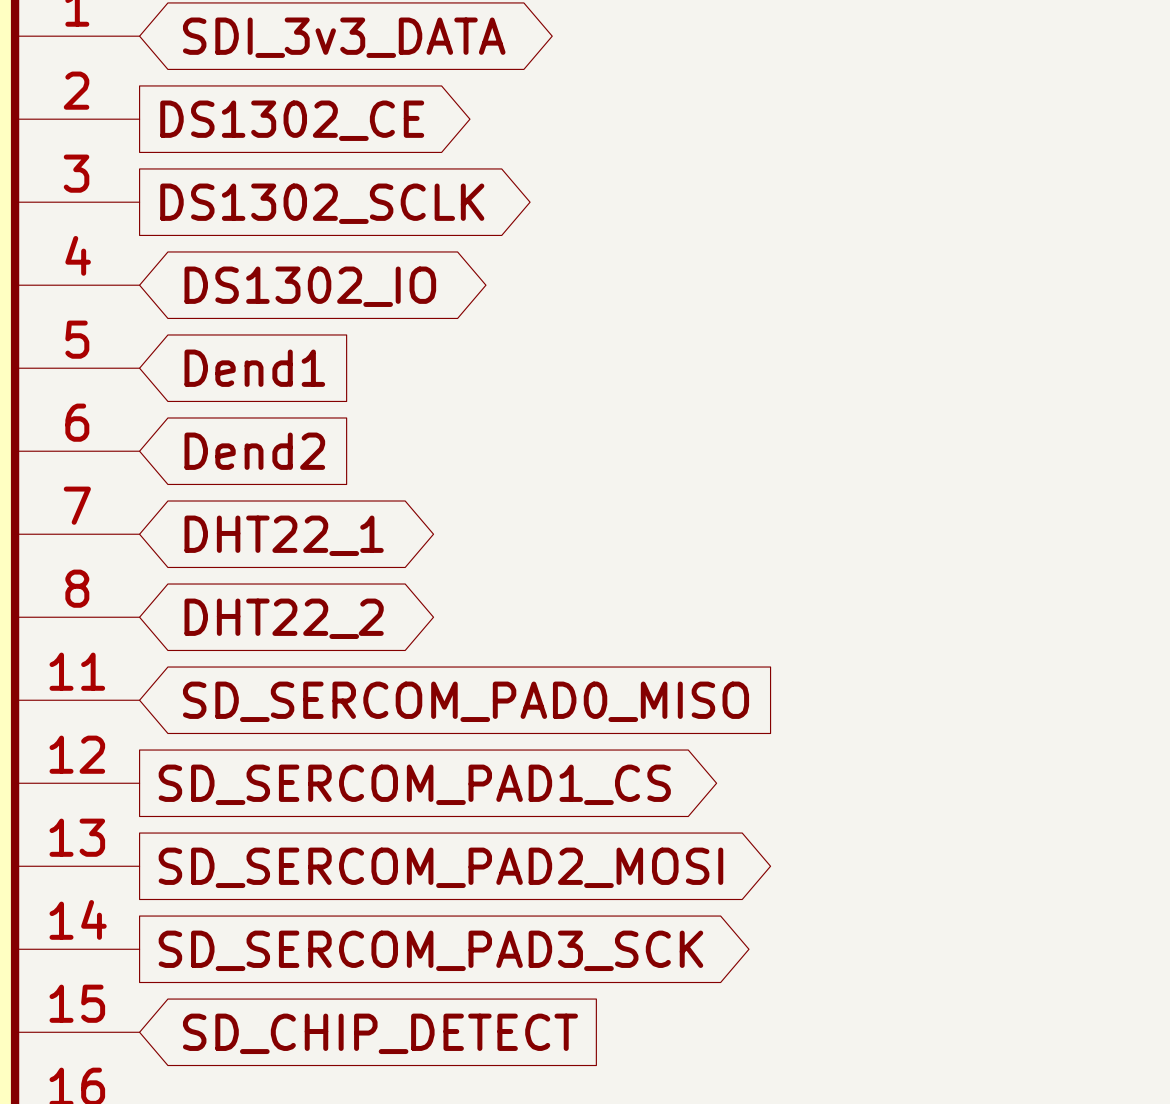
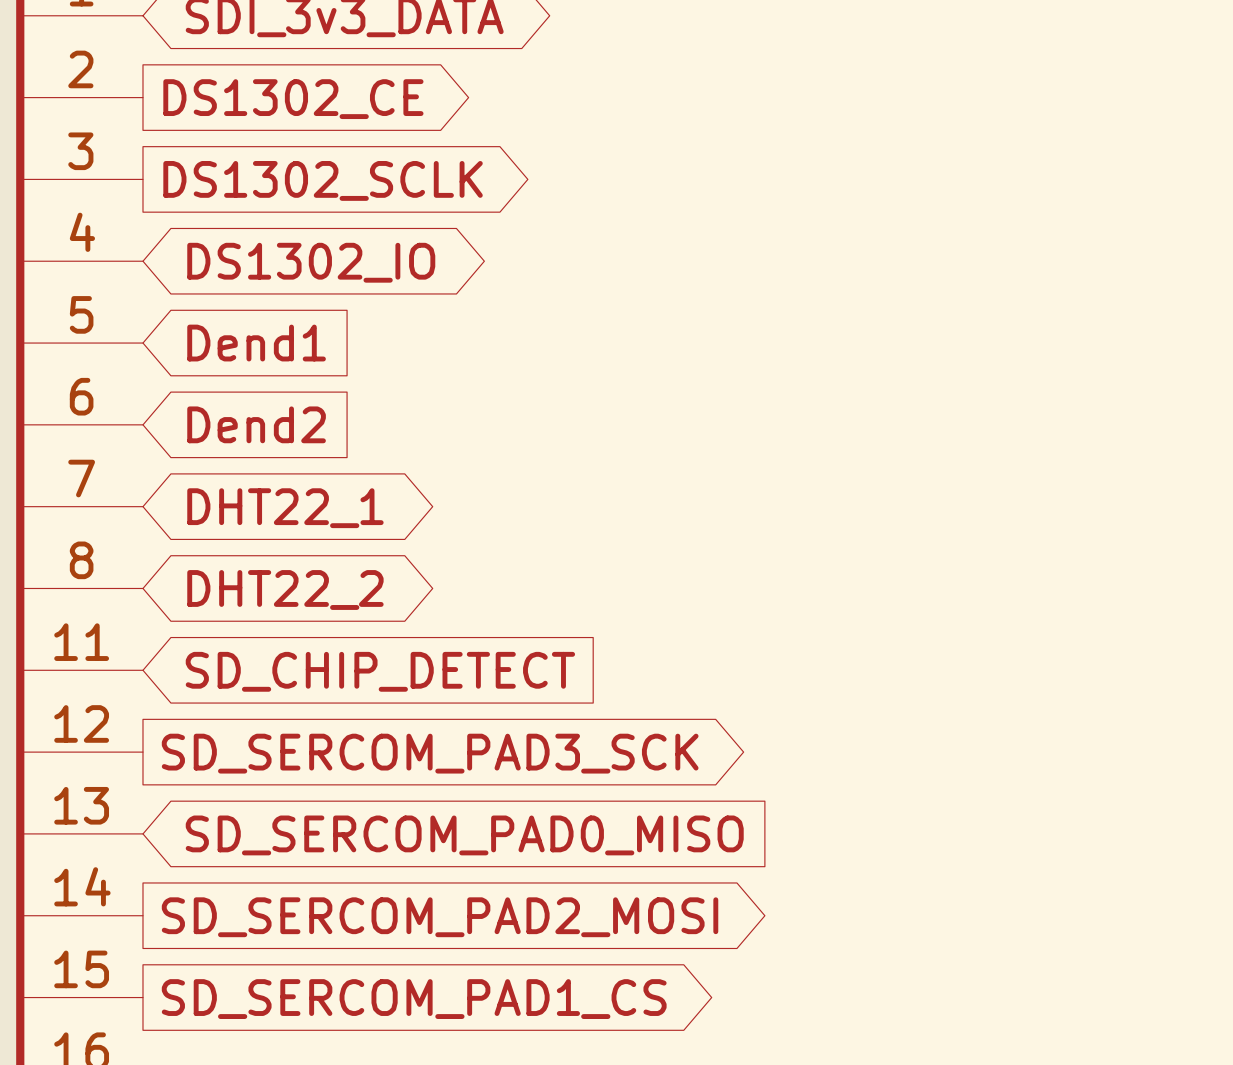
global label: SD_SERCOM_PAD0_MISO (466, 701) -> SD_CHIP_DETECT (380, 671)
global label: SD_SERCOM_PAD1_CS (414, 784) -> SD_SERCOM_PAD3_SCK (430, 753)
global label shape: output (440, 867) -> input (464, 835)
global label: SD_SERCOM_PAD2_MOSI (440, 867) -> SD_SERCOM_PAD0_MISO (464, 835)
global label: SD_SERCOM_PAD3_SCK (430, 950) -> SD_SERCOM_PAD2_MOSI (440, 917)
global label shape: input (380, 1033) -> output (414, 999)
global label: SD_CHIP_DETECT (380, 1033) -> SD_SERCOM_PAD1_CS (414, 999)

